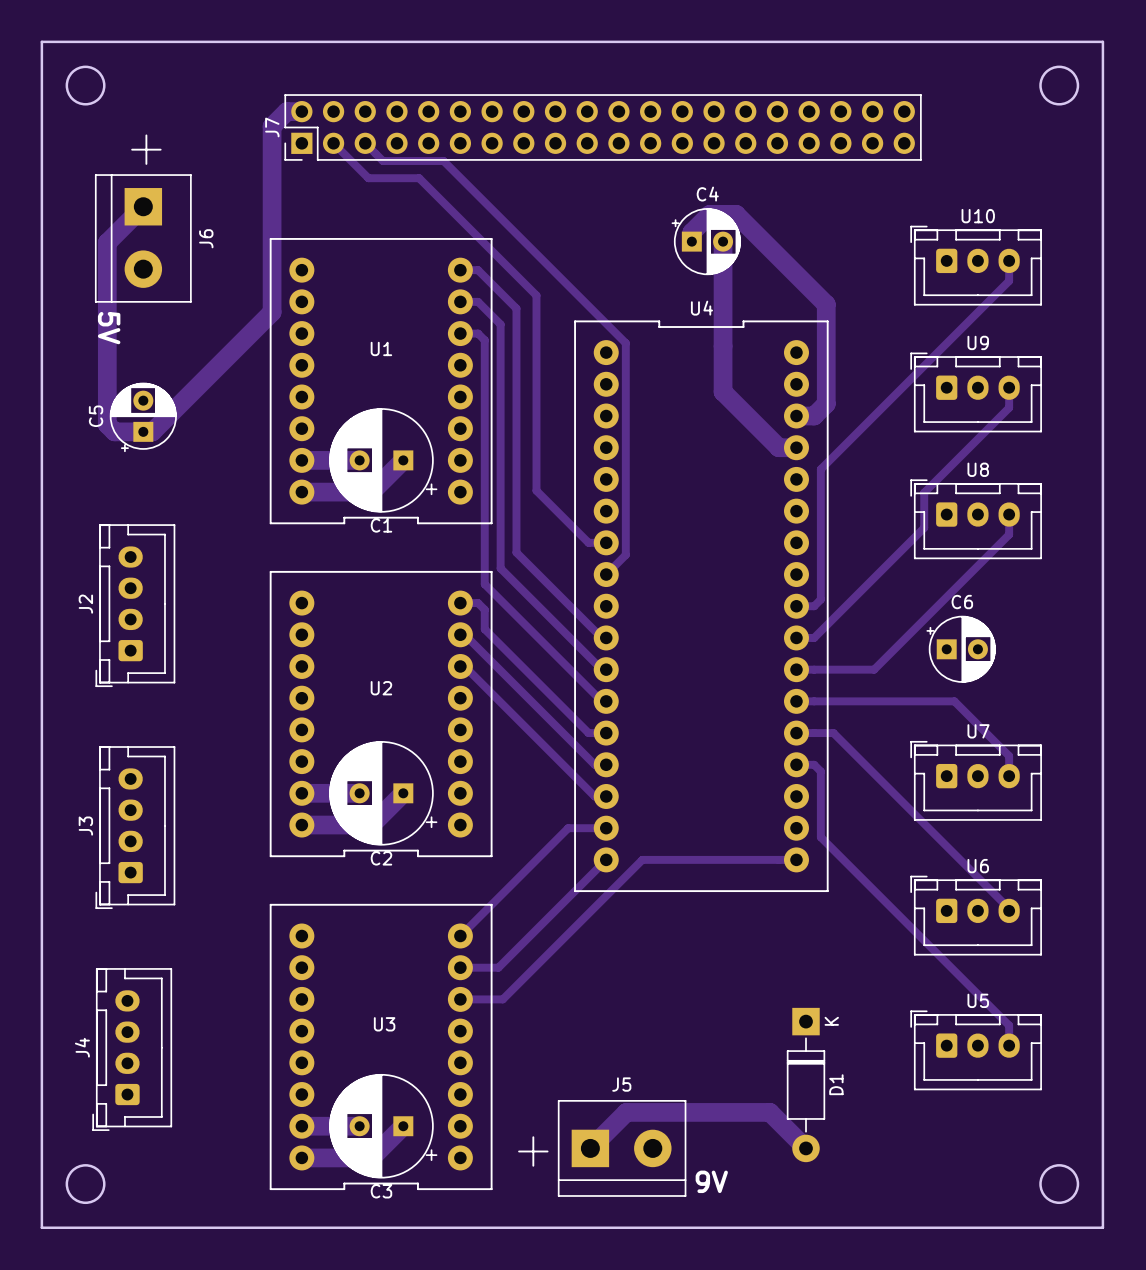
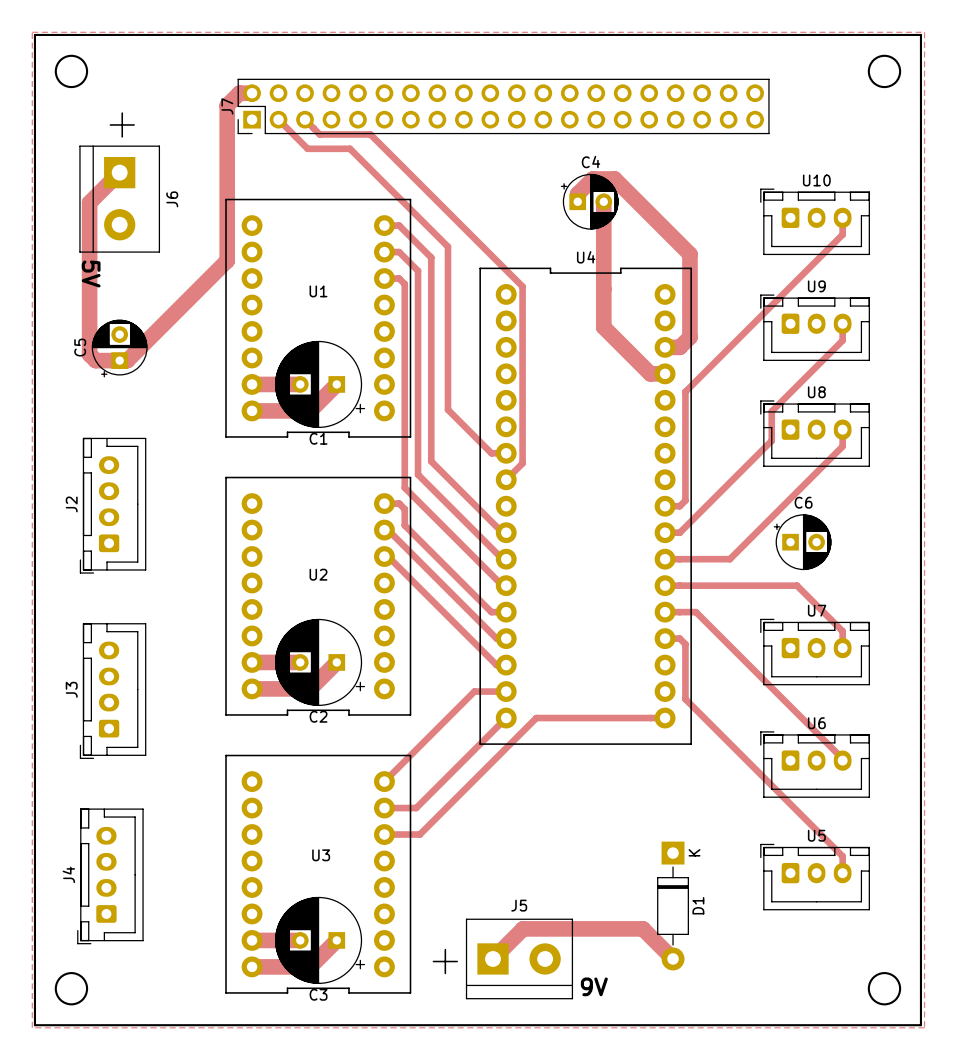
zone outline: none -> (32, 32) (924, 32) (924, 1027) (32, 1027) (32, 32)

